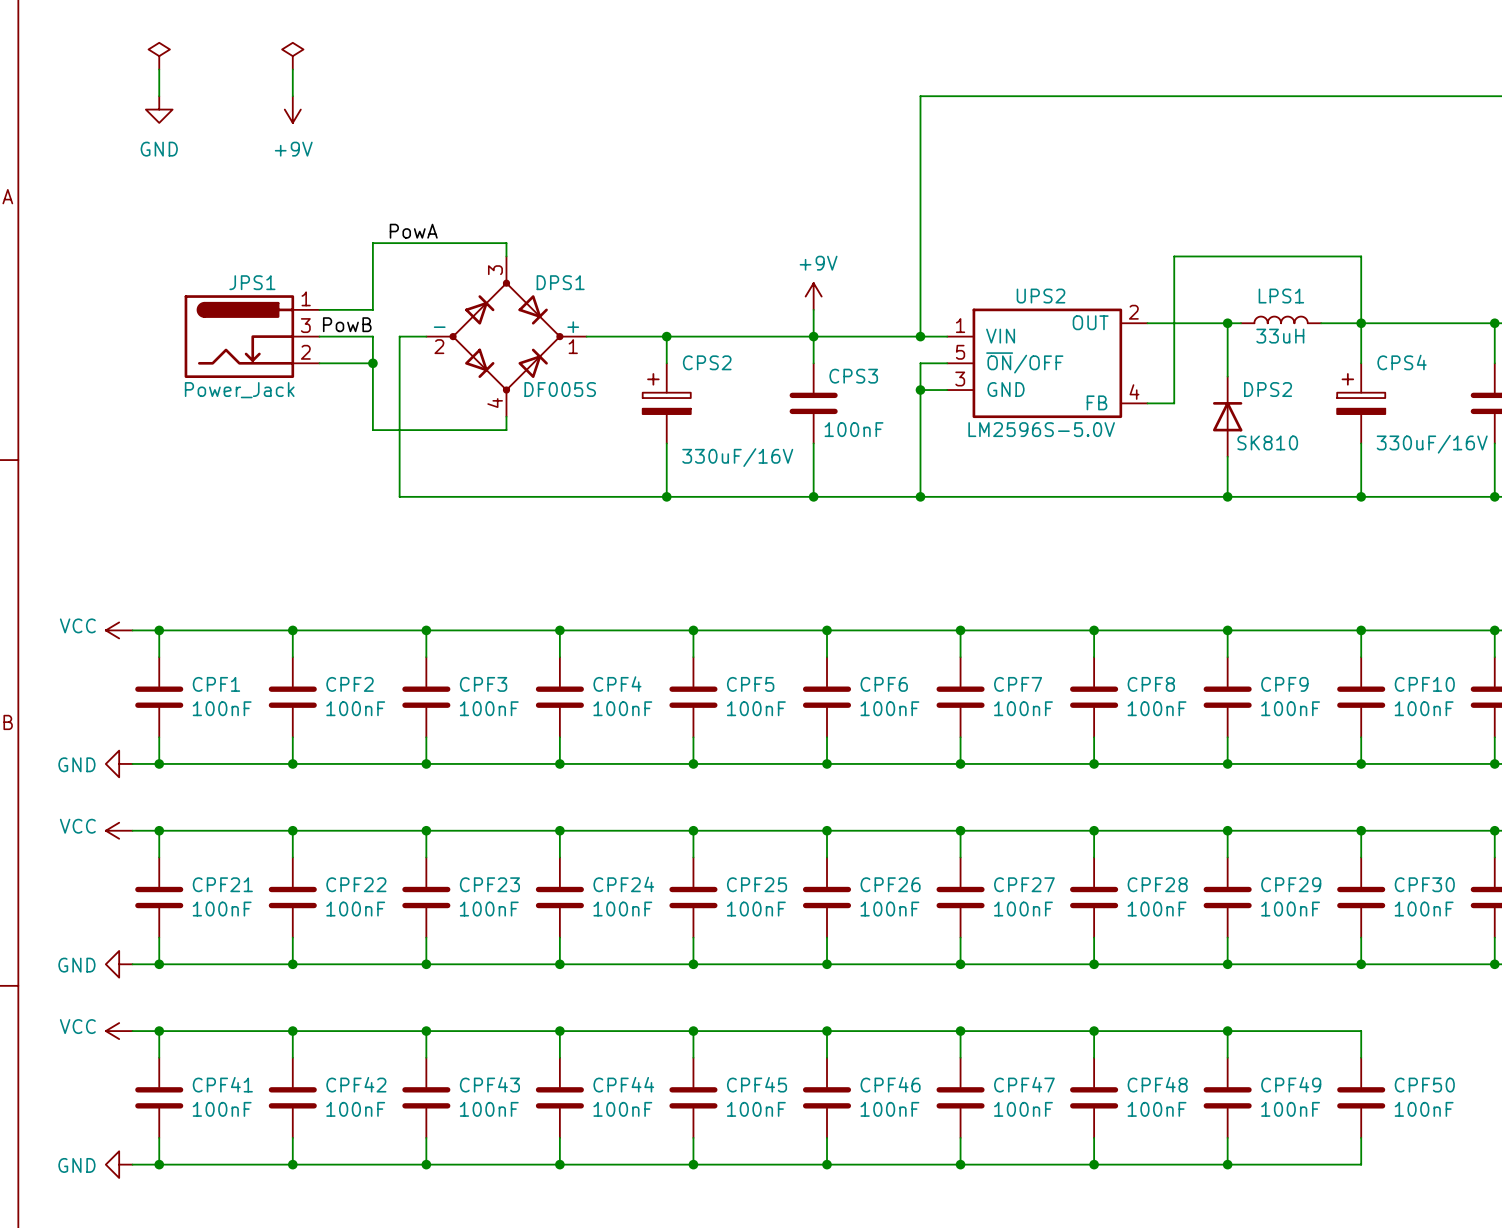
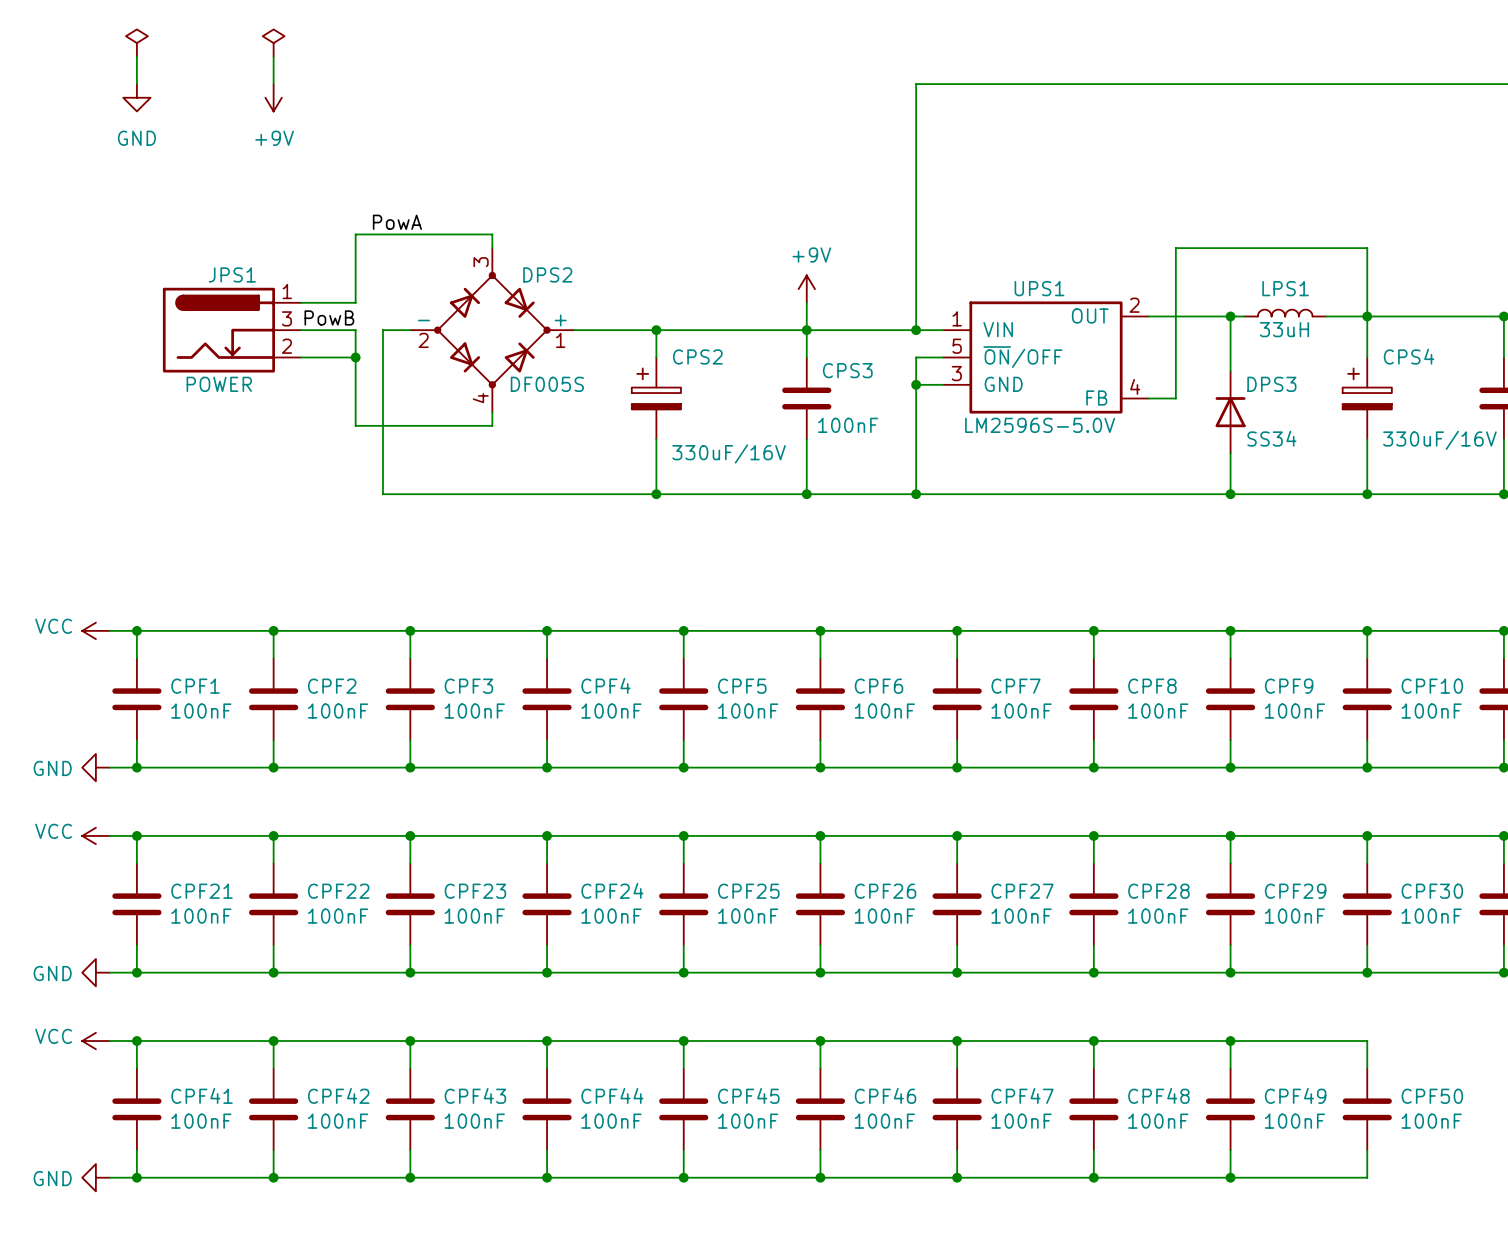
DPS1 name: DPS1 (560, 282) -> DPS2 (547, 274)
UPS2 name: UPS2 (1041, 296) -> UPS1 (1039, 288)
DPS2 name: DPS2 (1268, 389) -> DPS3 (1271, 384)
JPS1 value: Power_Jack (239, 390) -> POWER (219, 384)
DPS2 value: SK810 (1267, 442) -> SS34 (1271, 438)

